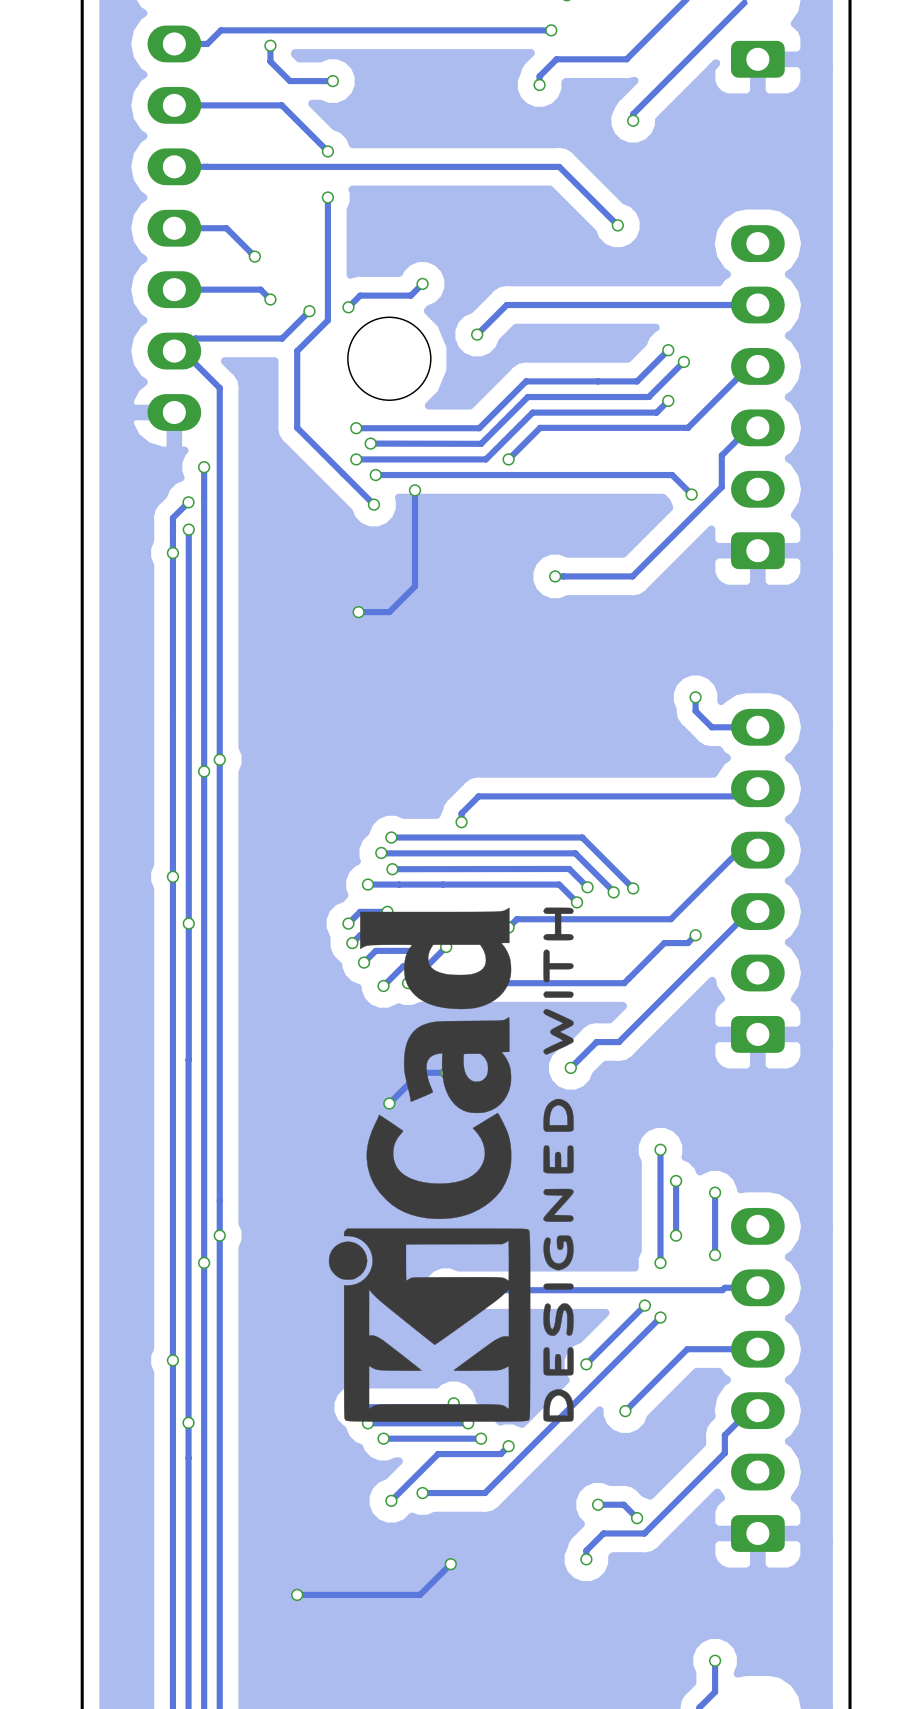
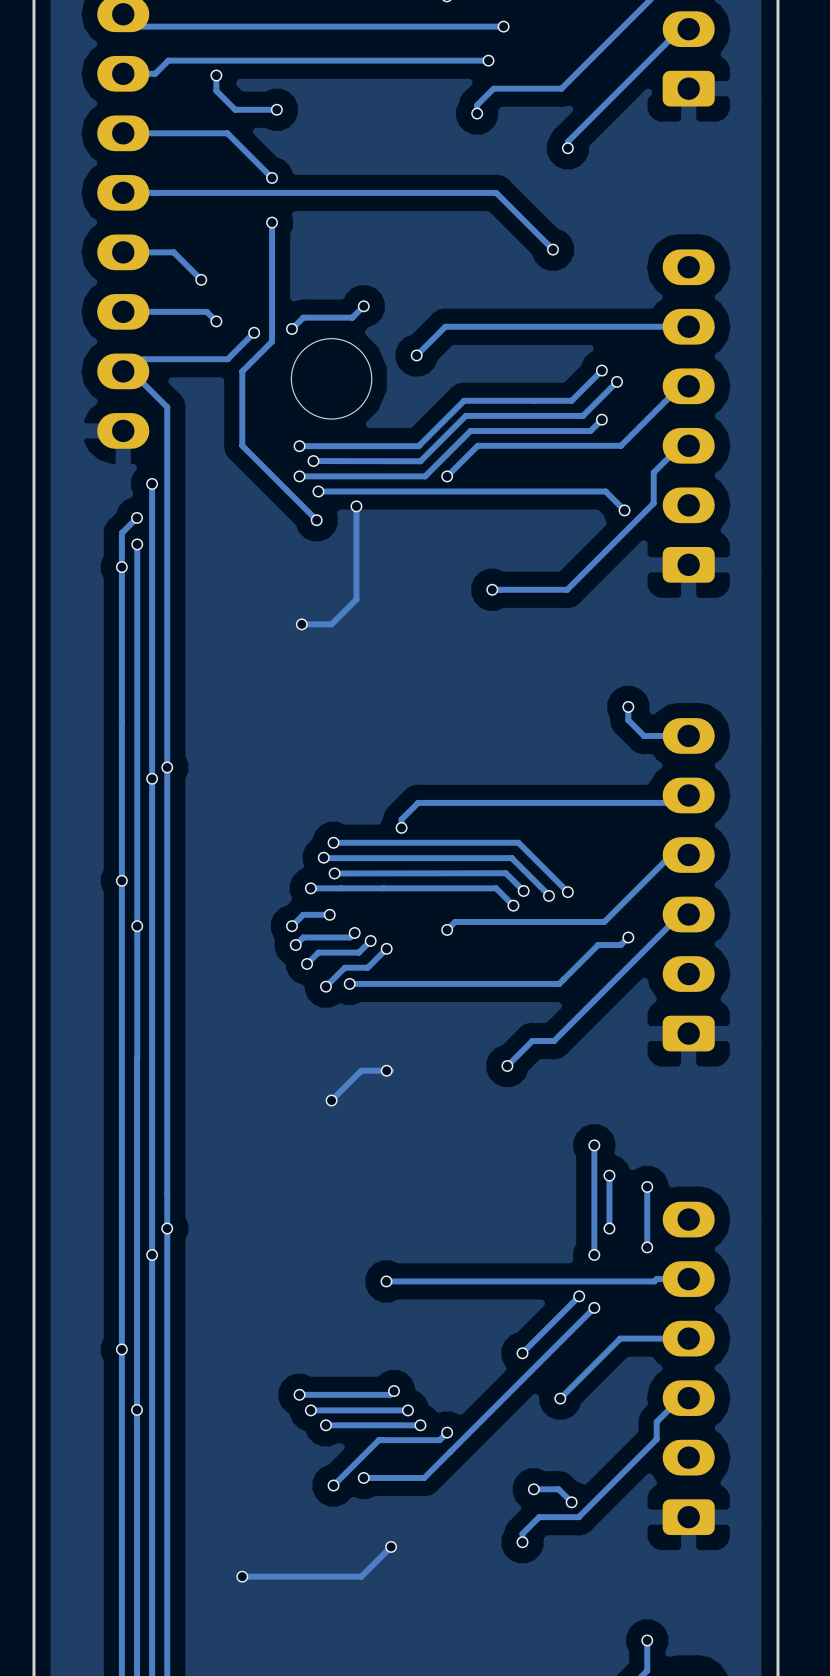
drawing: [328, 907, 574, 1422] -> none

